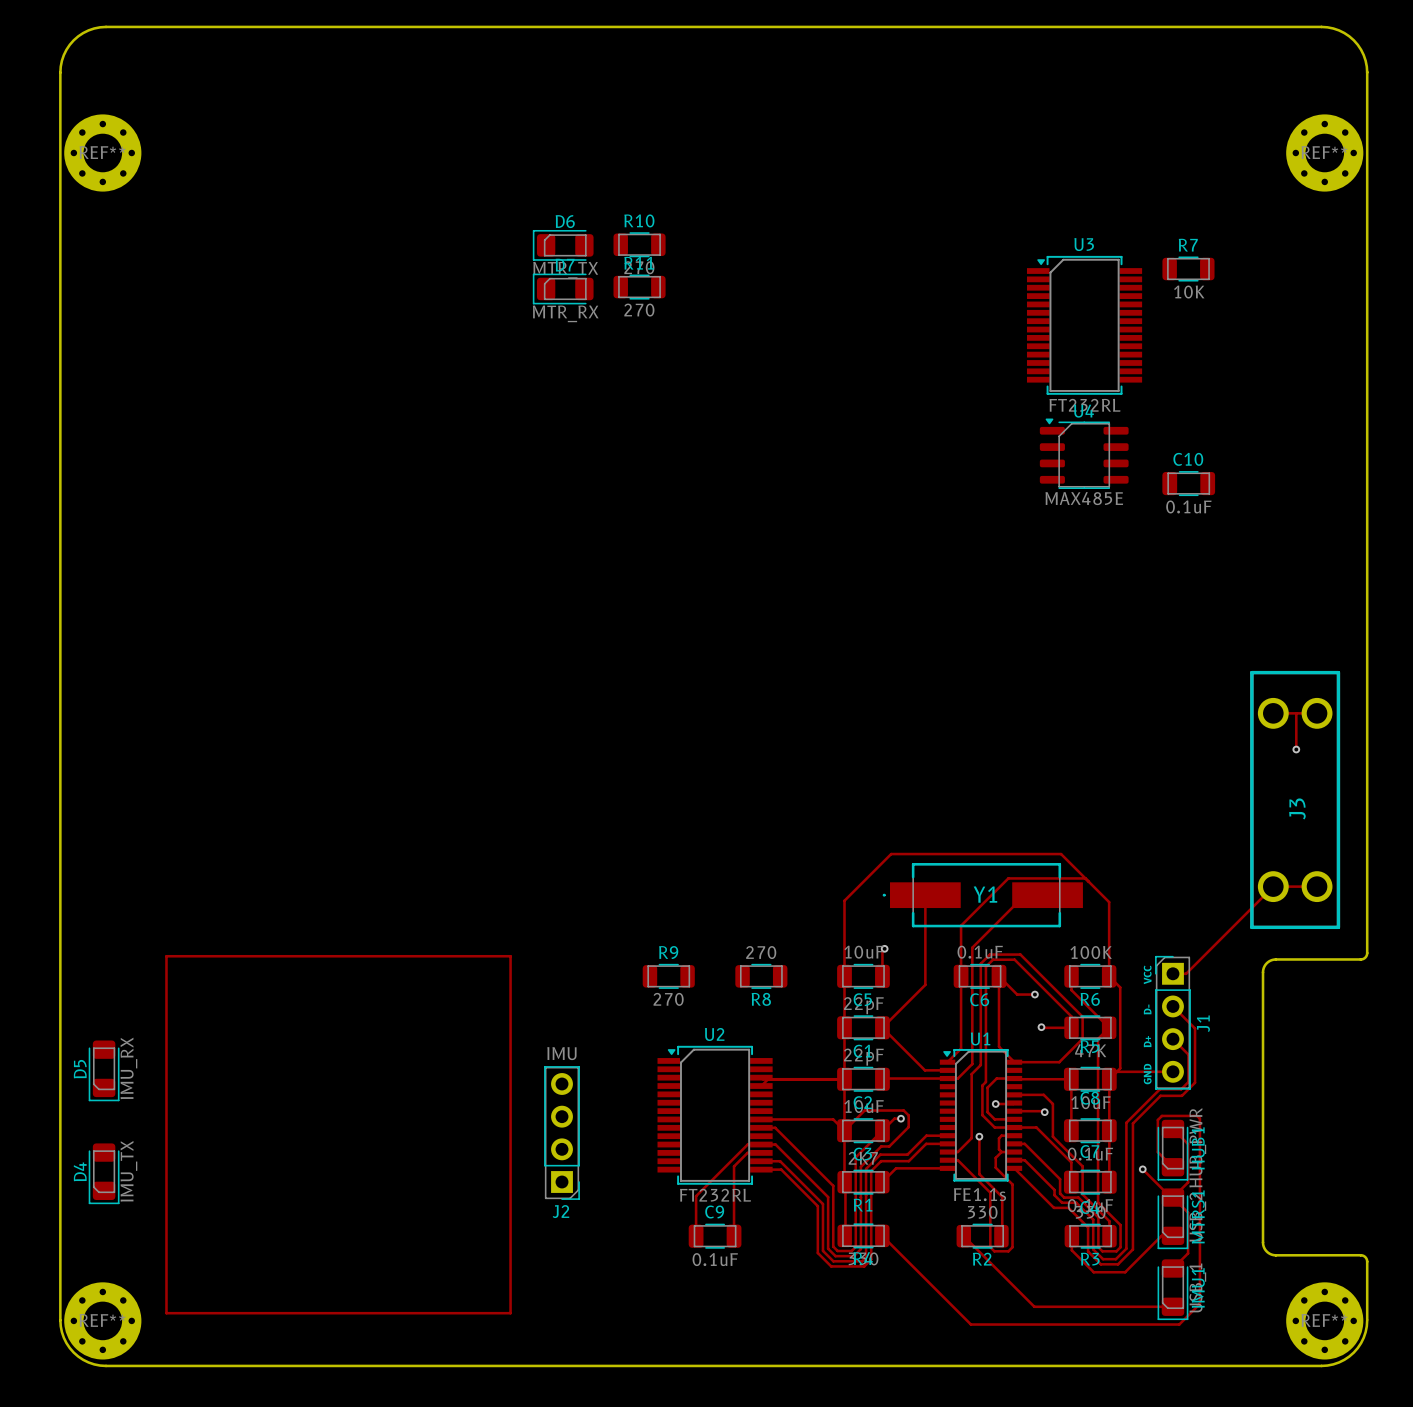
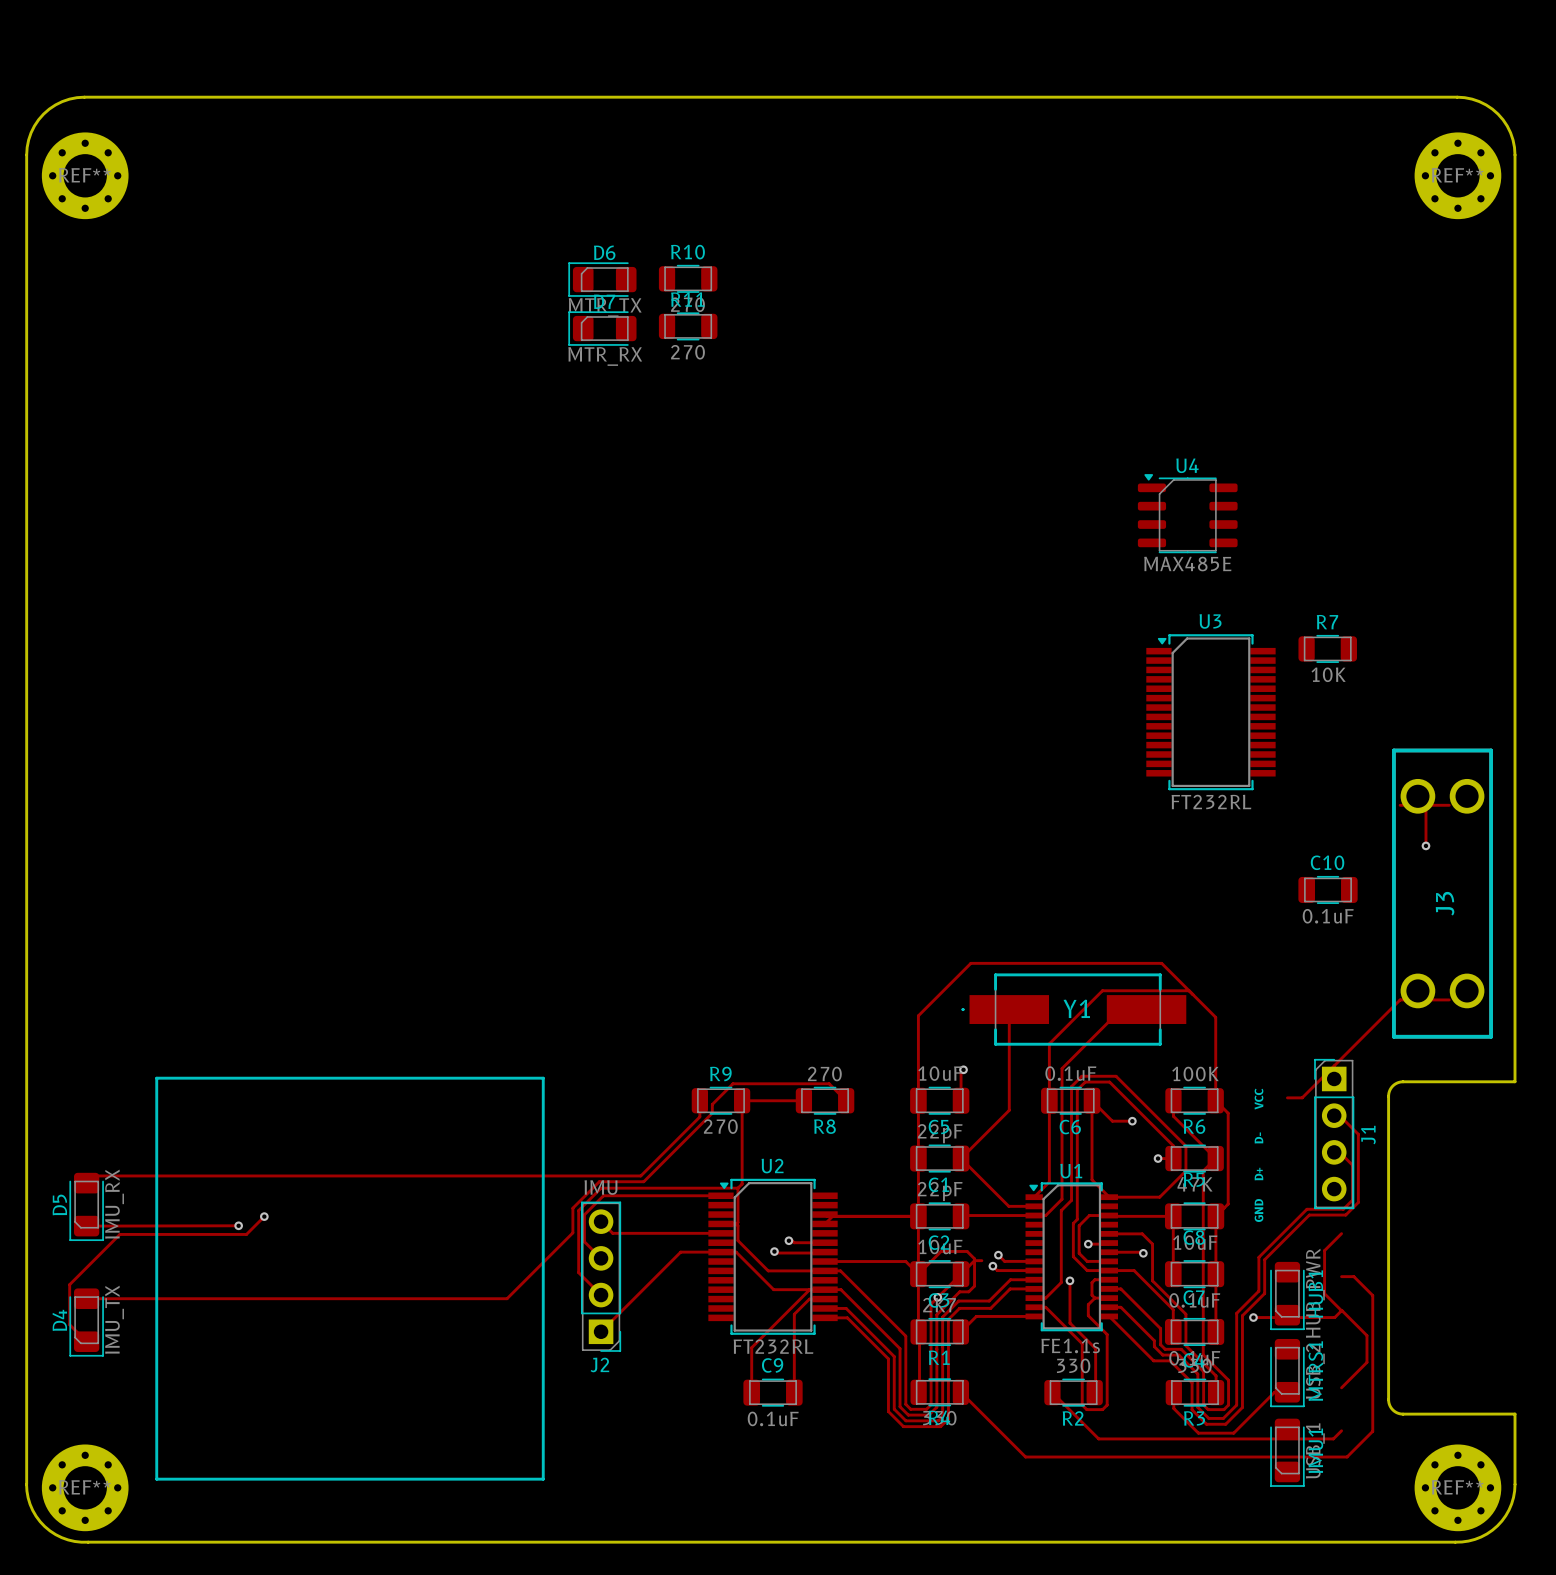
board edge: (1367, 71) (1367, 953) (1365, 957) (1360, 959) -> (26, 1484) (26, 154) (31, 132) (38, 119) (55, 104) (69, 99) (84, 97) (1457, 97) (1472, 99) (1492, 109) (1503, 119) (1510, 132) (1515, 154) (1515, 1081) (1498, 1081)
board edge: (1367, 72) (1363, 55) (1353, 40) (1339, 30) (1321, 26) (106, 26) (88, 30) (73, 40) (63, 55) (60, 72) (60, 1320) (63, 1337) (73, 1352) (88, 1362) (106, 1365) (1321, 1365) (1339, 1362) (1353, 1352) (1363, 1337) (1367, 1320) -> none
R7 position: (1188, 269) -> (1327, 648)
U3 position: (1084, 325) -> (1210, 712)
C10 position: (1188, 483) -> (1328, 889)
J3 position: (1295, 799) -> (1442, 893)
track: (166, 956) (510, 956) (510, 1313) (166, 1313) (166, 956) -> none
line: none -> (156, 1078) (543, 1078) (543, 1479) (156, 1479) (156, 1078)
track: none -> (699, 1100) (699, 1116) (640, 1175) (93, 1175) (86, 1183)
track: none -> (803, 1100) (742, 1100) (742, 1184) (737, 1188)
track: none -> (846, 1100) (829, 1083) (733, 1083) (712, 1104) (712, 1113) (643, 1181) (599, 1181) (572, 1208) (572, 1232) (507, 1298) (86, 1298)
track: (1172, 1006) (1195, 1028) (1195, 1082) (1181, 1095) (1160, 1095) (1132, 1123) (1132, 1167) -> (1334, 1115) (1339, 1115) (1358, 1134) (1358, 1202) (1345, 1215) (1309, 1215) (1264, 1259) (1264, 1293) (1242, 1315)
J1 position: (1172, 1022) -> (1334, 1134)
track: (1041, 1027) (1057, 1027) -> none
via position: (1041, 1027) -> (1158, 1158)
track: (1172, 1039) (1188, 1054) (1188, 1082) (1181, 1089) (1159, 1089) (1126, 1122) (1126, 1248) -> (1334, 1152) (1339, 1152) (1352, 1165) (1352, 1200) (1343, 1209) (1306, 1209) (1258, 1257) (1258, 1291) (1236, 1313) (1236, 1405) (1235, 1406)
track: none -> (737, 1188) (737, 1222) (721, 1223)
track: none -> (737, 1188) (601, 1188) (578, 1210) (578, 1272) (601, 1295)
track: none -> (721, 1195) (603, 1195) (584, 1214) (584, 1241) (601, 1258)
track: (1116, 1071) (1172, 1071) -> none
track: none -> (264, 1216) (246, 1234) (119, 1234) (69, 1284) (69, 1324) (86, 1341)
via: none -> (264, 1216)
track: none -> (601, 1221) (612, 1233) (721, 1233)
track: none -> (736, 1223) (737, 1225) (737, 1240) (768, 1270) (825, 1270)
track: none -> (86, 1226) (238, 1226)
via: none -> (238, 1225)
track: none -> (1341, 1233) (1324, 1250) (1324, 1293) (1341, 1310)
track: none -> (788, 1240) (794, 1242) (825, 1242)
via: none -> (788, 1240)
track: none -> (774, 1251) (825, 1252)
via: none -> (774, 1251)
track: (887, 1110) (903, 1110) (908, 1115) (908, 1127) (894, 1141) -> (967, 1251) (974, 1258) (974, 1286)
track: none -> (998, 1255) (1004, 1261) (1034, 1261)
via: none -> (998, 1255)
via: (900, 1118) -> none
track: none -> (992, 1266) (997, 1270) (1034, 1270)
via: none -> (992, 1266)
track: (1172, 1128) (1188, 1144) (1188, 1182) (1172, 1197) -> none
track: none -> (809, 1289) (773, 1289) (736, 1252) (680, 1252) (601, 1331)
via: none -> (937, 1297)
track: none -> (1341, 1310) (1366, 1335) (1366, 1362) (1341, 1387)
track: (1172, 1167) (1157, 1152) (1157, 1120) (1161, 1115) (1197, 1115) (1199, 1118) (1199, 1303) (1179, 1324) (970, 1324) (939, 1293) -> (1341, 1276) (1353, 1276) (1372, 1295) (1372, 1431) (1347, 1457) (1025, 1457)
track: (1142, 1169) (1172, 1197) -> (1253, 1317) (1334, 1317) (1341, 1310)
track: (1172, 1197) (1188, 1212) (1188, 1253) (1172, 1268) -> none
board edge: (1275, 1255) (1364, 1256) (1367, 1261) (1367, 1319) -> (1403, 1414) (1515, 1414) (1513, 1497) (1505, 1515) (1492, 1530) (1474, 1539) (1455, 1542) (81, 1542) (61, 1537) (44, 1526) (32, 1510) (28, 1497) (26, 1484)
track: (1005, 1277) (1034, 1306) (1172, 1306) -> (1098, 1438) (1333, 1438) (1341, 1430)

